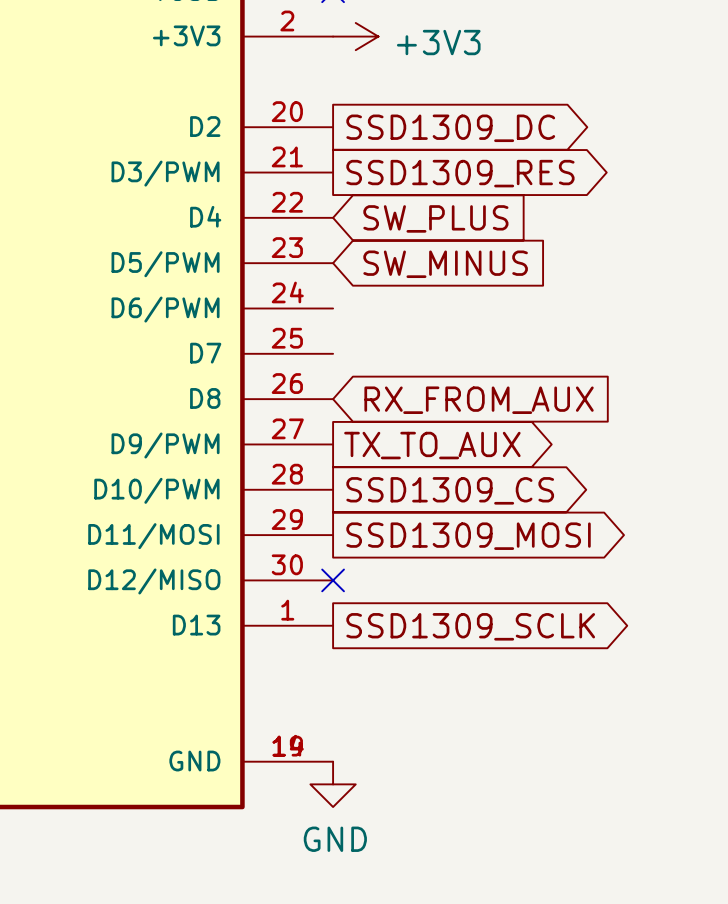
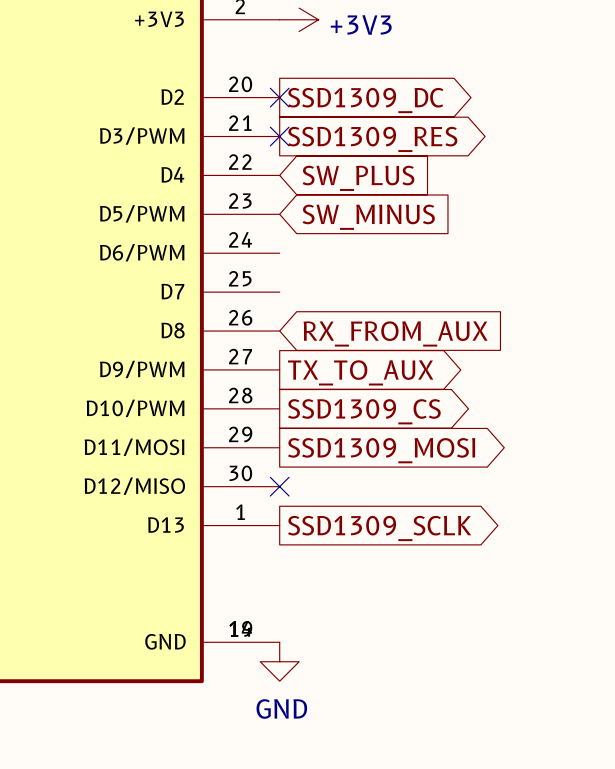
no-connect mark: none -> (279, 97)
no-connect mark: none -> (279, 136)

